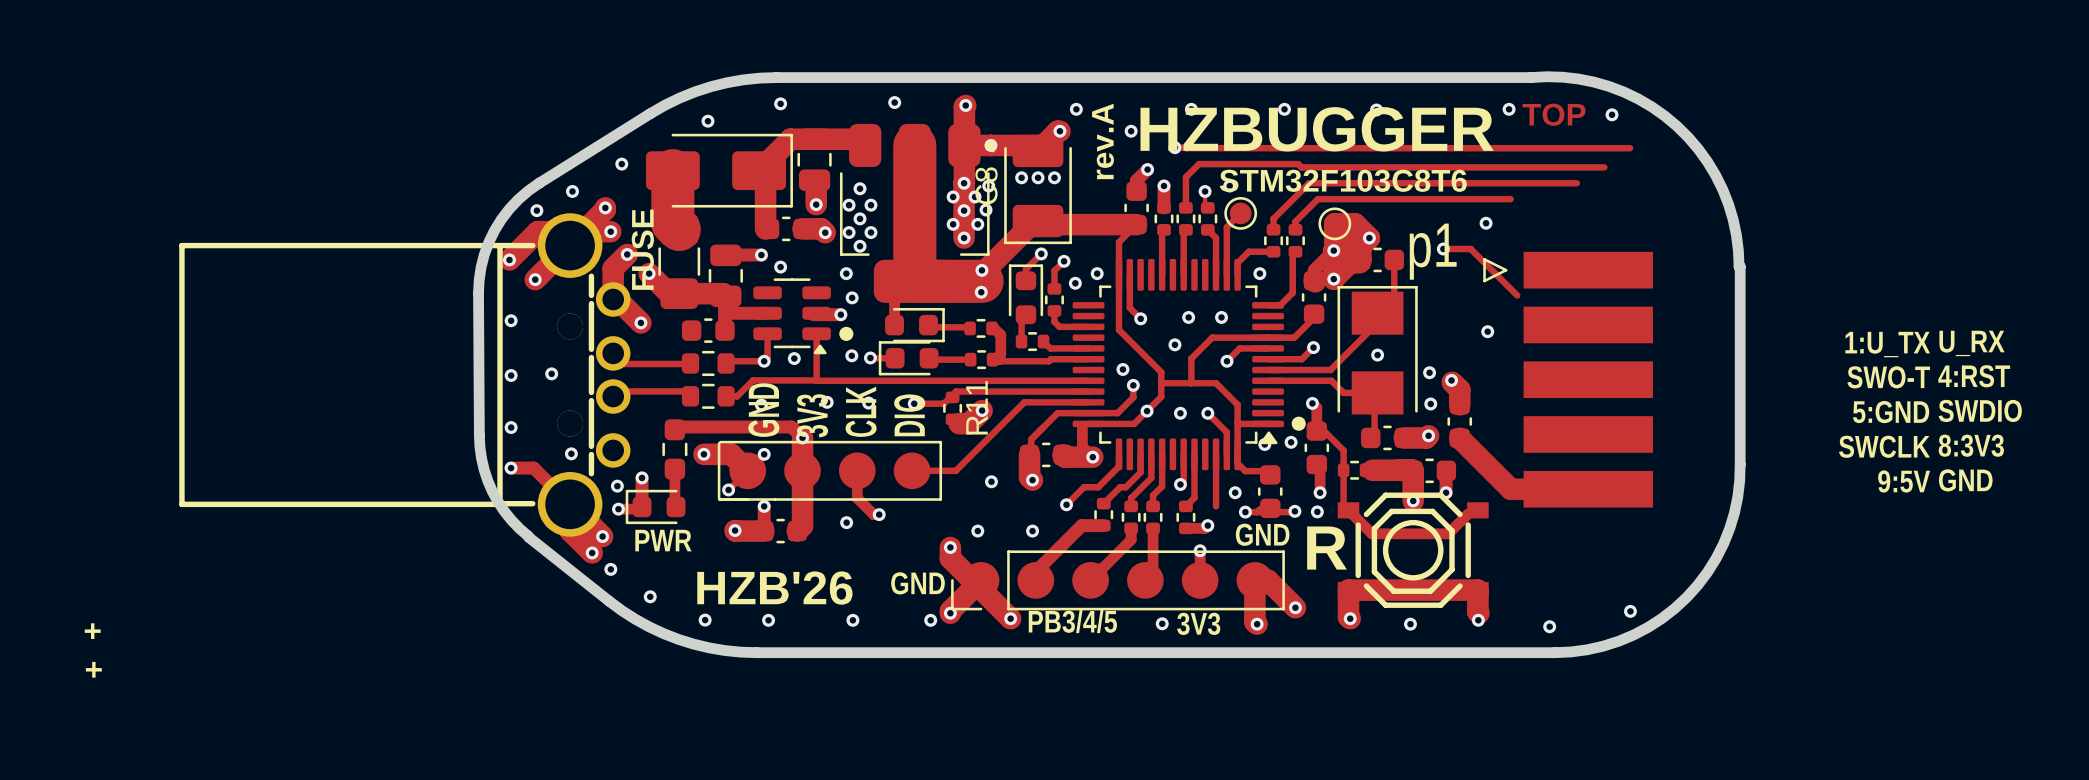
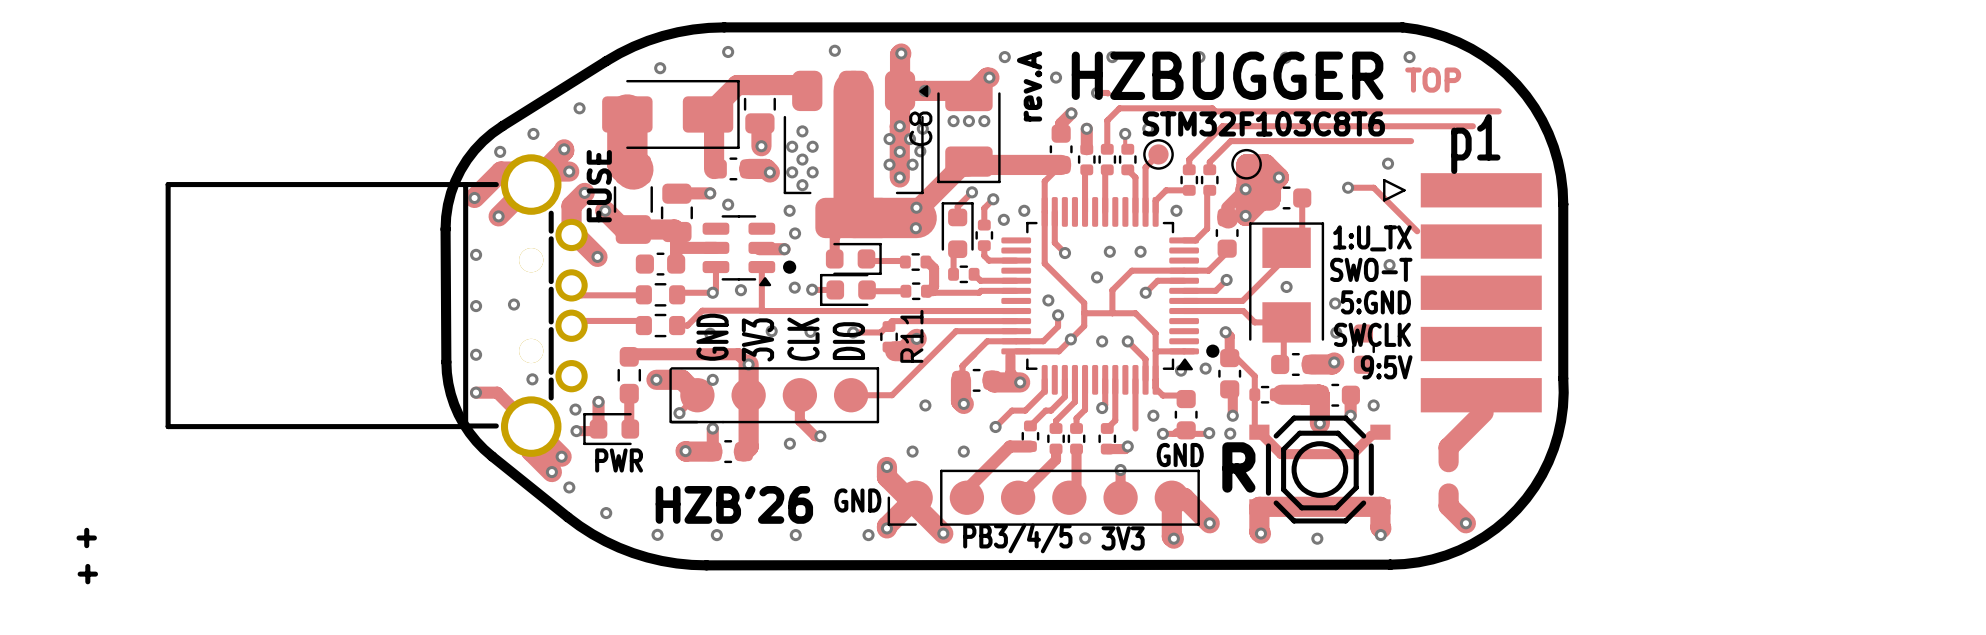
board edge: (1501, 77) (1546, 76) (1578, 78) (1609, 86) (1651, 106) (1676, 126) (1707, 162) (1722, 189) (1733, 219) (1740, 266) (1740, 464) (1734, 512) (1716, 558) (1697, 585) (1661, 618) (1633, 634) (1587, 649) (1554, 652) (740, 652) (693, 644) (649, 626) (609, 601) (528, 536) -> (1402, 27) (1444, 36) (1471, 48) (1495, 64) (1517, 84) (1534, 107) (1548, 133) (1557, 161) (1562, 189) (1563, 392) (1558, 435) (1542, 474) (1517, 509) (1484, 536) (1459, 550) (1418, 562) (1390, 564) (691, 564) (647, 557) (605, 541) (567, 517) (492, 456)
text position: TOP (1554, 114) -> TOP (1433, 80)
via: (1612, 114) -> none
track: (1186, 148) (1630, 148) -> none
text position: p1 (1433, 251) -> p1 (1475, 144)
text: U_RX (1972, 343) -> none
text position: 1:U_TX (1887, 344) -> 1:U_TX (1372, 238)
text: 4:RST (1974, 376) -> none
text position: SWO-T (1888, 377) -> SWO-T (1371, 269)
part position: (1568, 379) -> (1462, 292)
via: (1451, 380) -> none
track: (1452, 382) (1459, 389) (1459, 404) -> none
text: SWDIO (1980, 410) -> none
text position: 5:GND (1891, 412) -> 5:GND (1375, 302)
track: (1459, 438) (1510, 489) (1580, 489) -> none
text: 8:3V3 (1971, 445) -> none
text position: SWCLK (1884, 446) -> SWCLK (1372, 334)
text: GND (1965, 480) -> none
via: none -> (1373, 405)
text position: 9:5V (1904, 481) -> 9:5V (1386, 367)
track: none -> (1483, 412) (1448, 447) (1448, 462)
track: none -> (1448, 493) (1448, 506) (1465, 523)
via: (1630, 611) -> none
via position: (1549, 626) -> (1465, 523)

